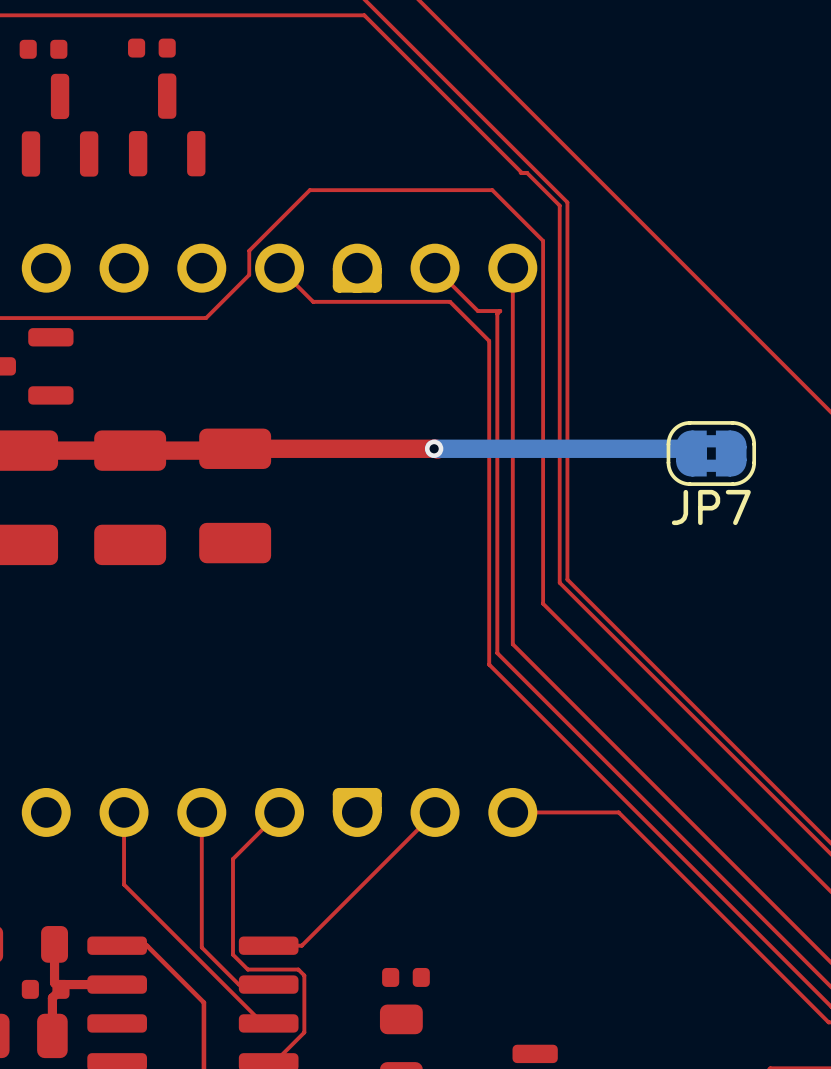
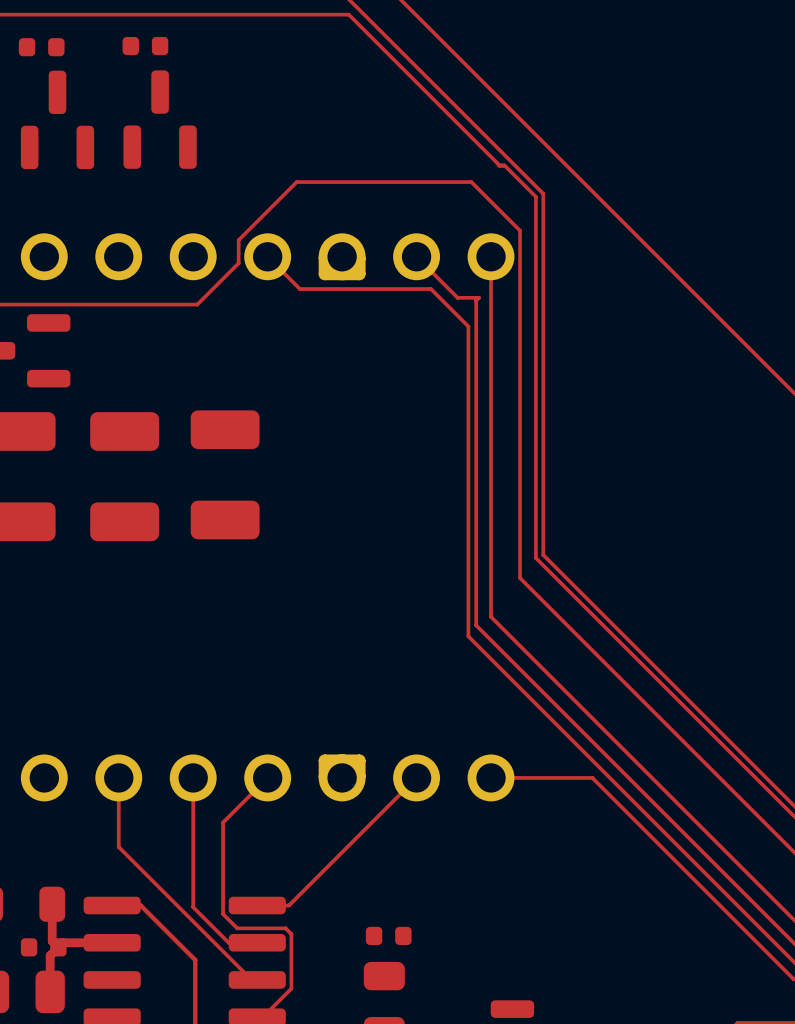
bottom track: (434, 448) (686, 448) (691, 453) -> none
via: (434, 448) -> none
top track: (437, 449) (22, 450) -> none
JP7: (711, 453) -> none

